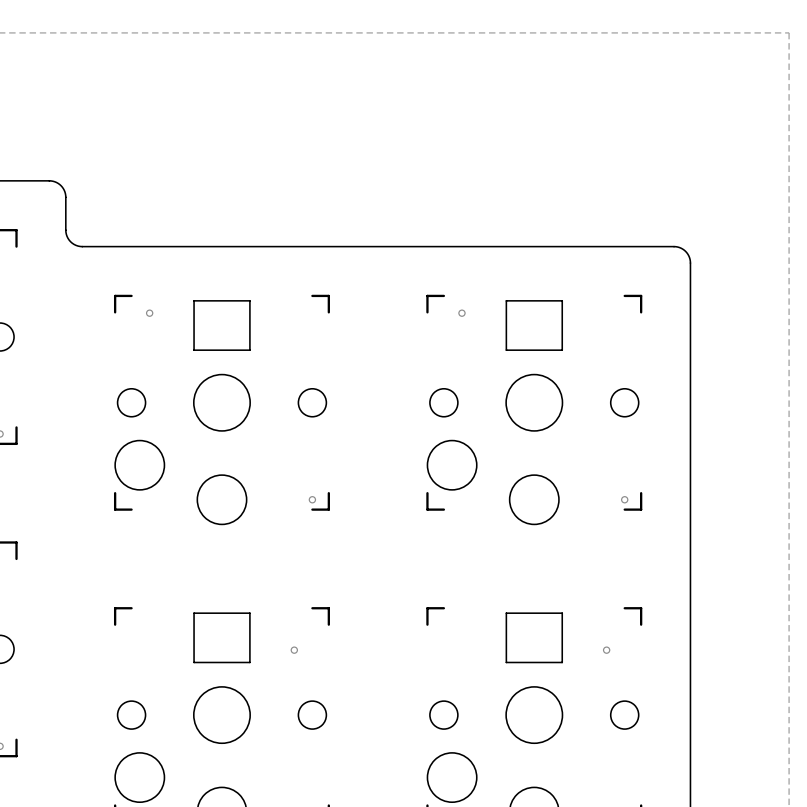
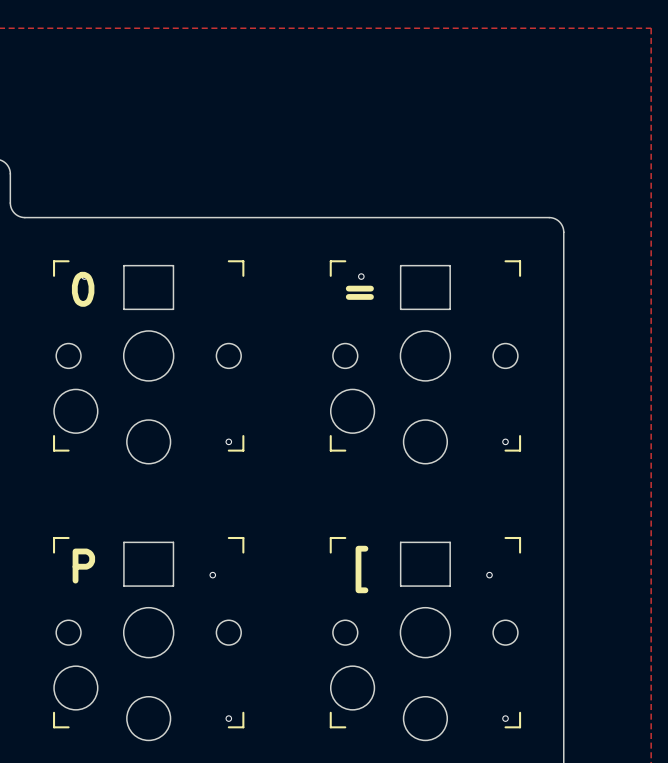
text: none -> 0 (83, 289)
text: none -> = (359, 292)
text: none -> P (83, 566)
text: none -> [ (361, 569)

